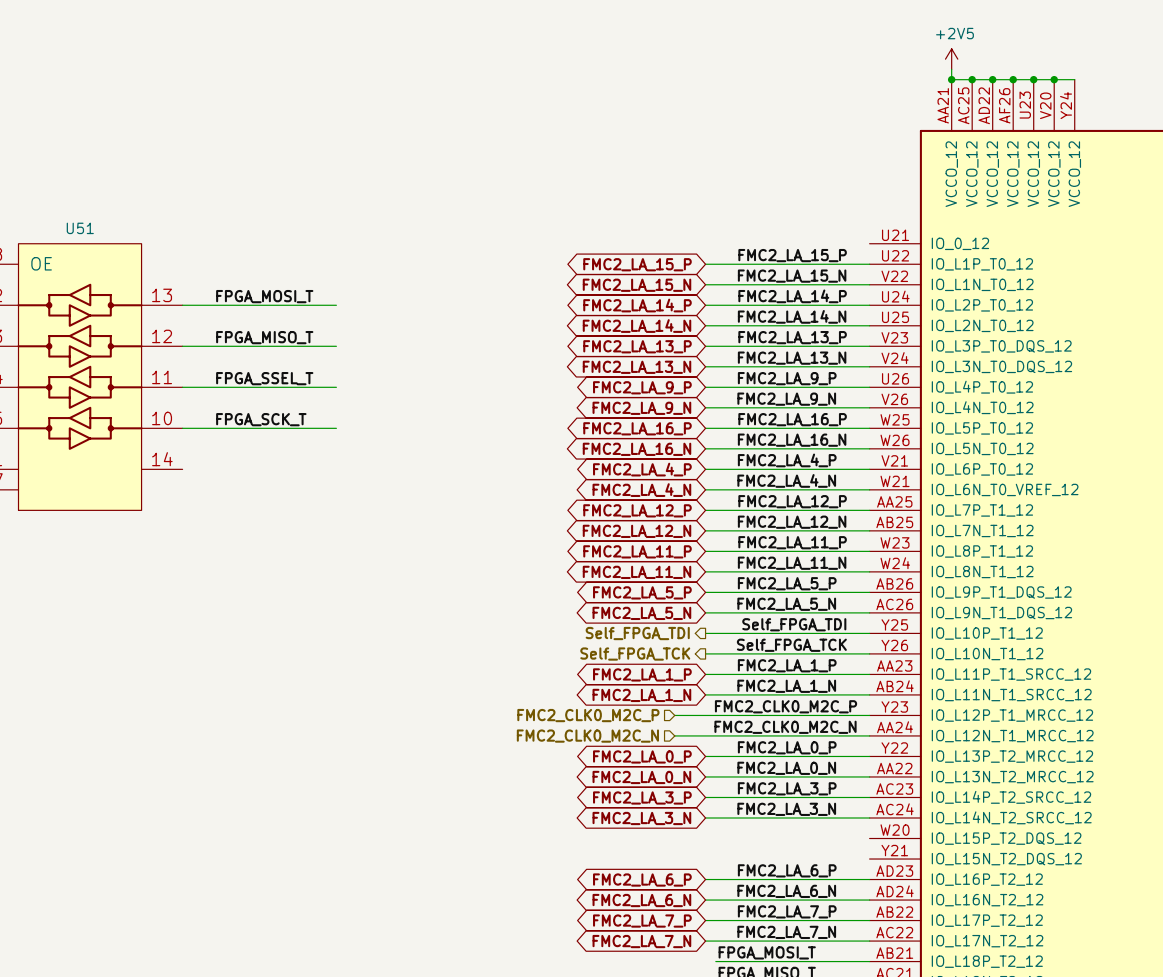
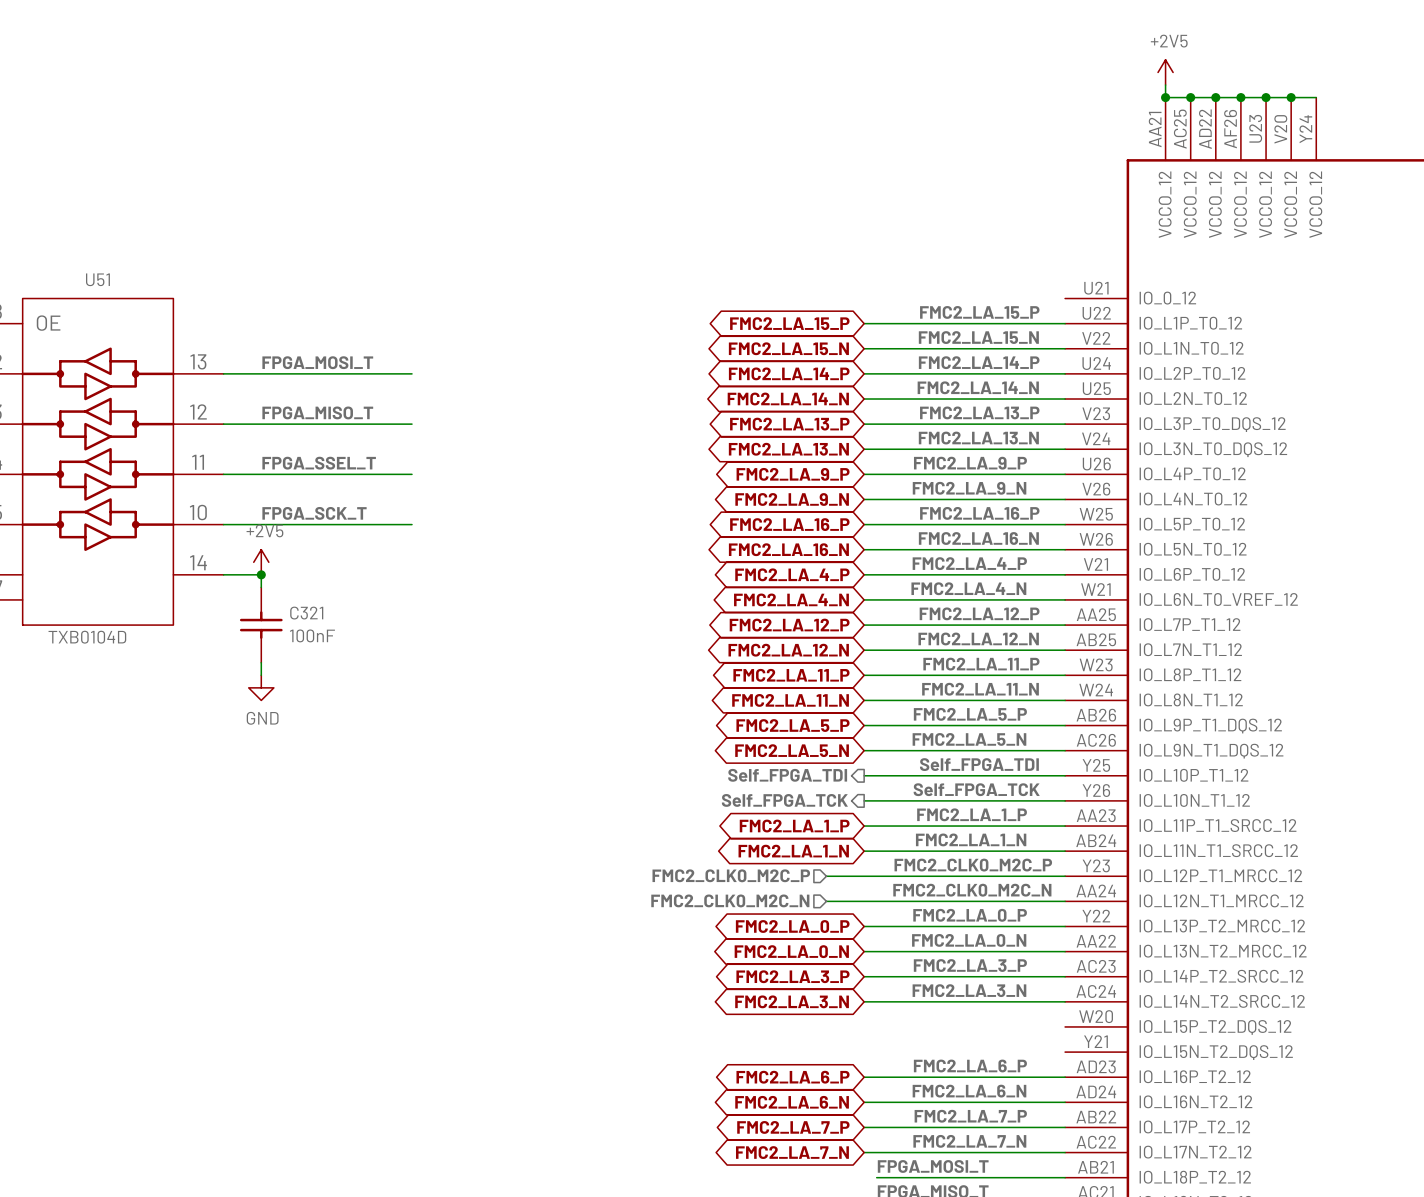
power symbol: none -> +2V5 (261, 562)
wire: none -> (223, 574) (261, 574) (261, 587)
junction: none -> (261, 574)
C321: none -> (261, 625)
U51 value: none -> TXB0104D (87, 637)
wire: none -> (261, 662) (261, 675)
power symbol: none -> GND (261, 687)

